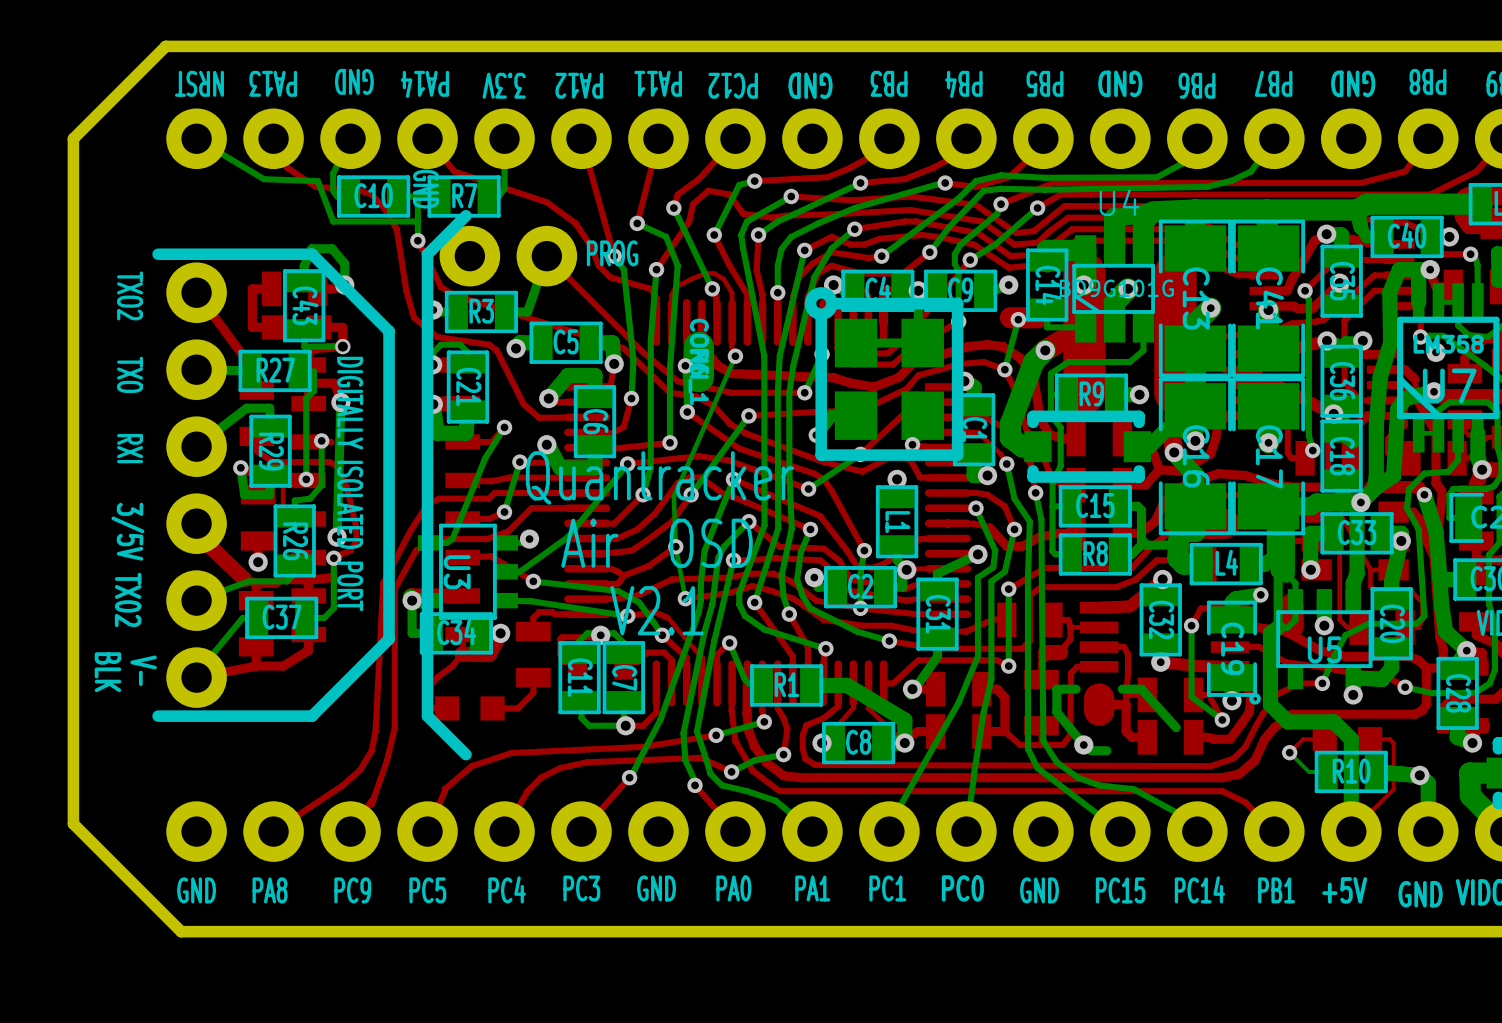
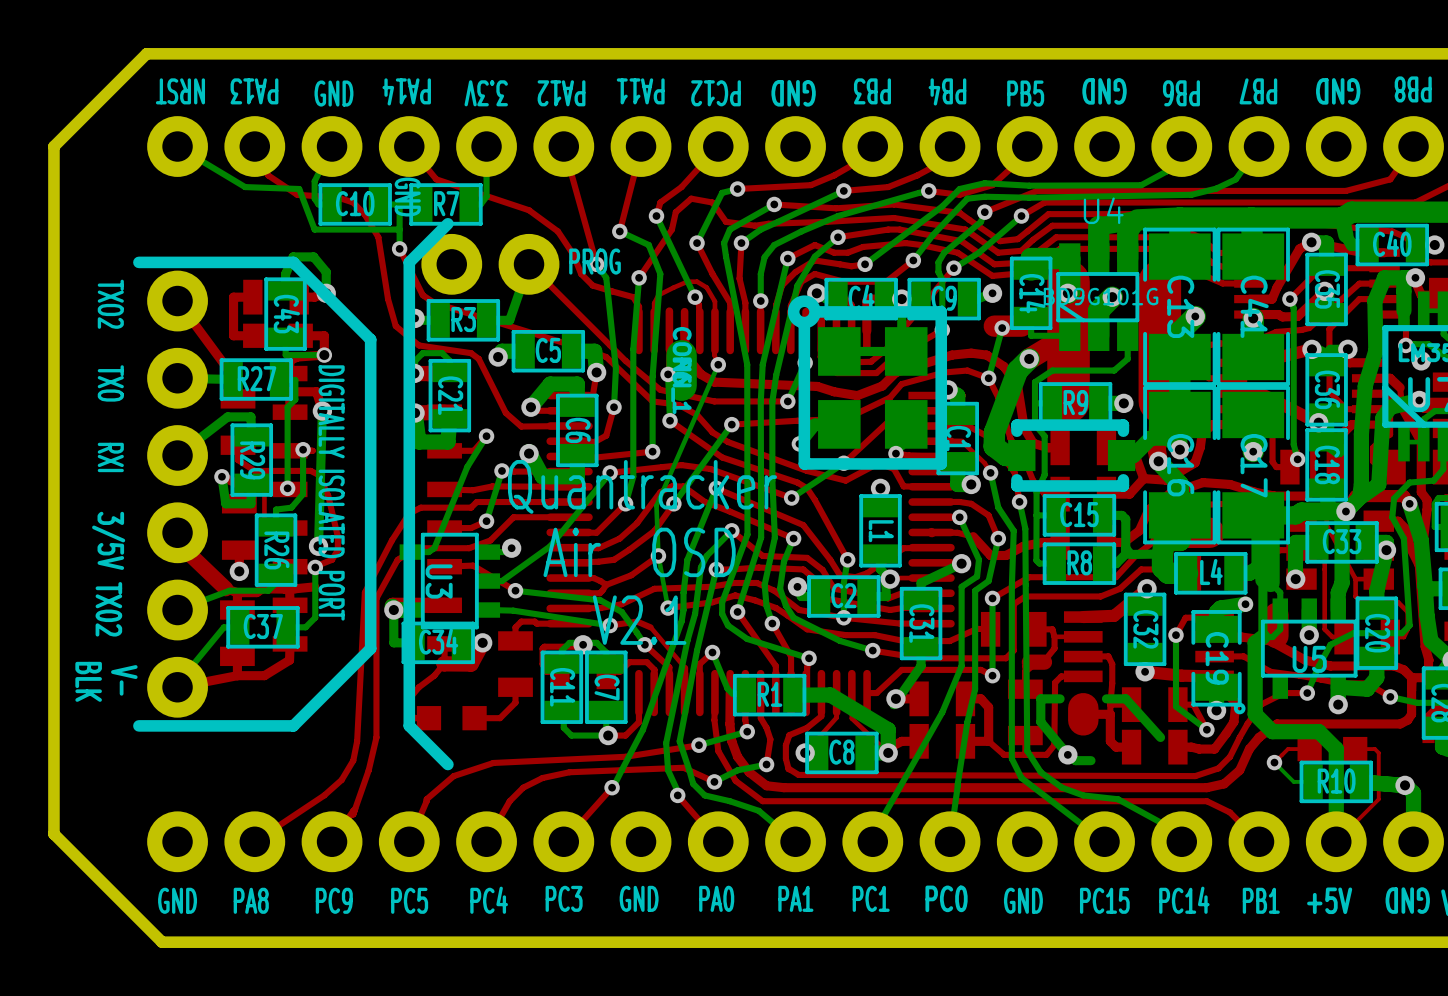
text rotation: 0° (354, 81) -> 180° (333, 93)
text rotation: 0° (1044, 83) -> 180° (1025, 93)
text rotation: 0° (1420, 894) -> 180° (1407, 900)

